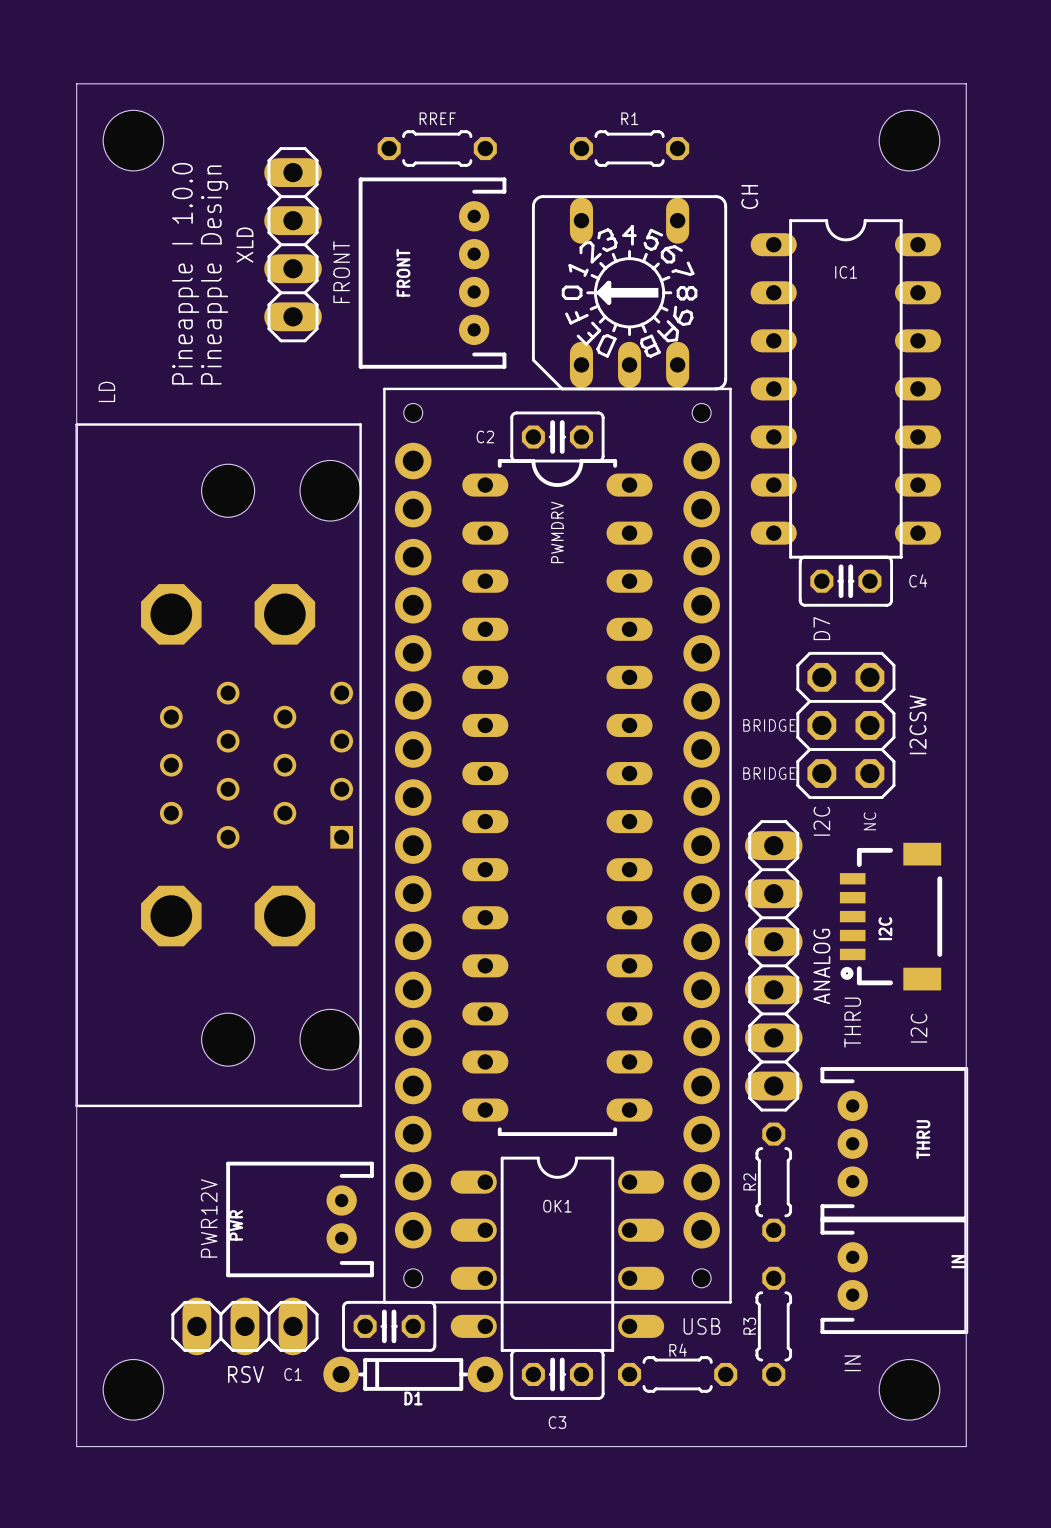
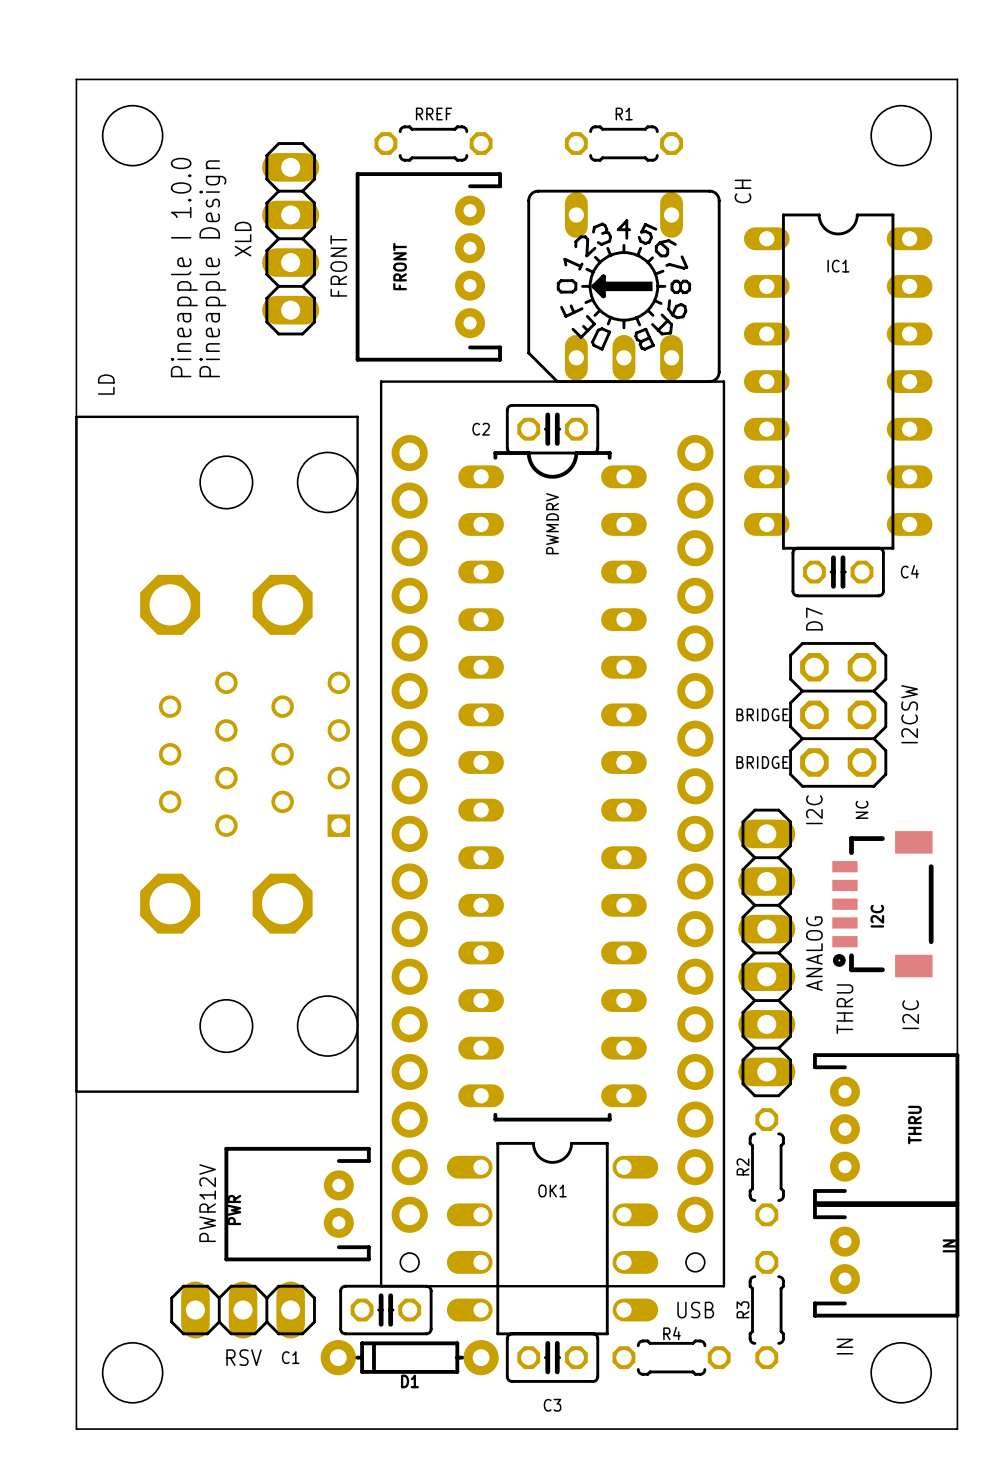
hole: (413, 412) -> none
hole: (701, 412) -> none

